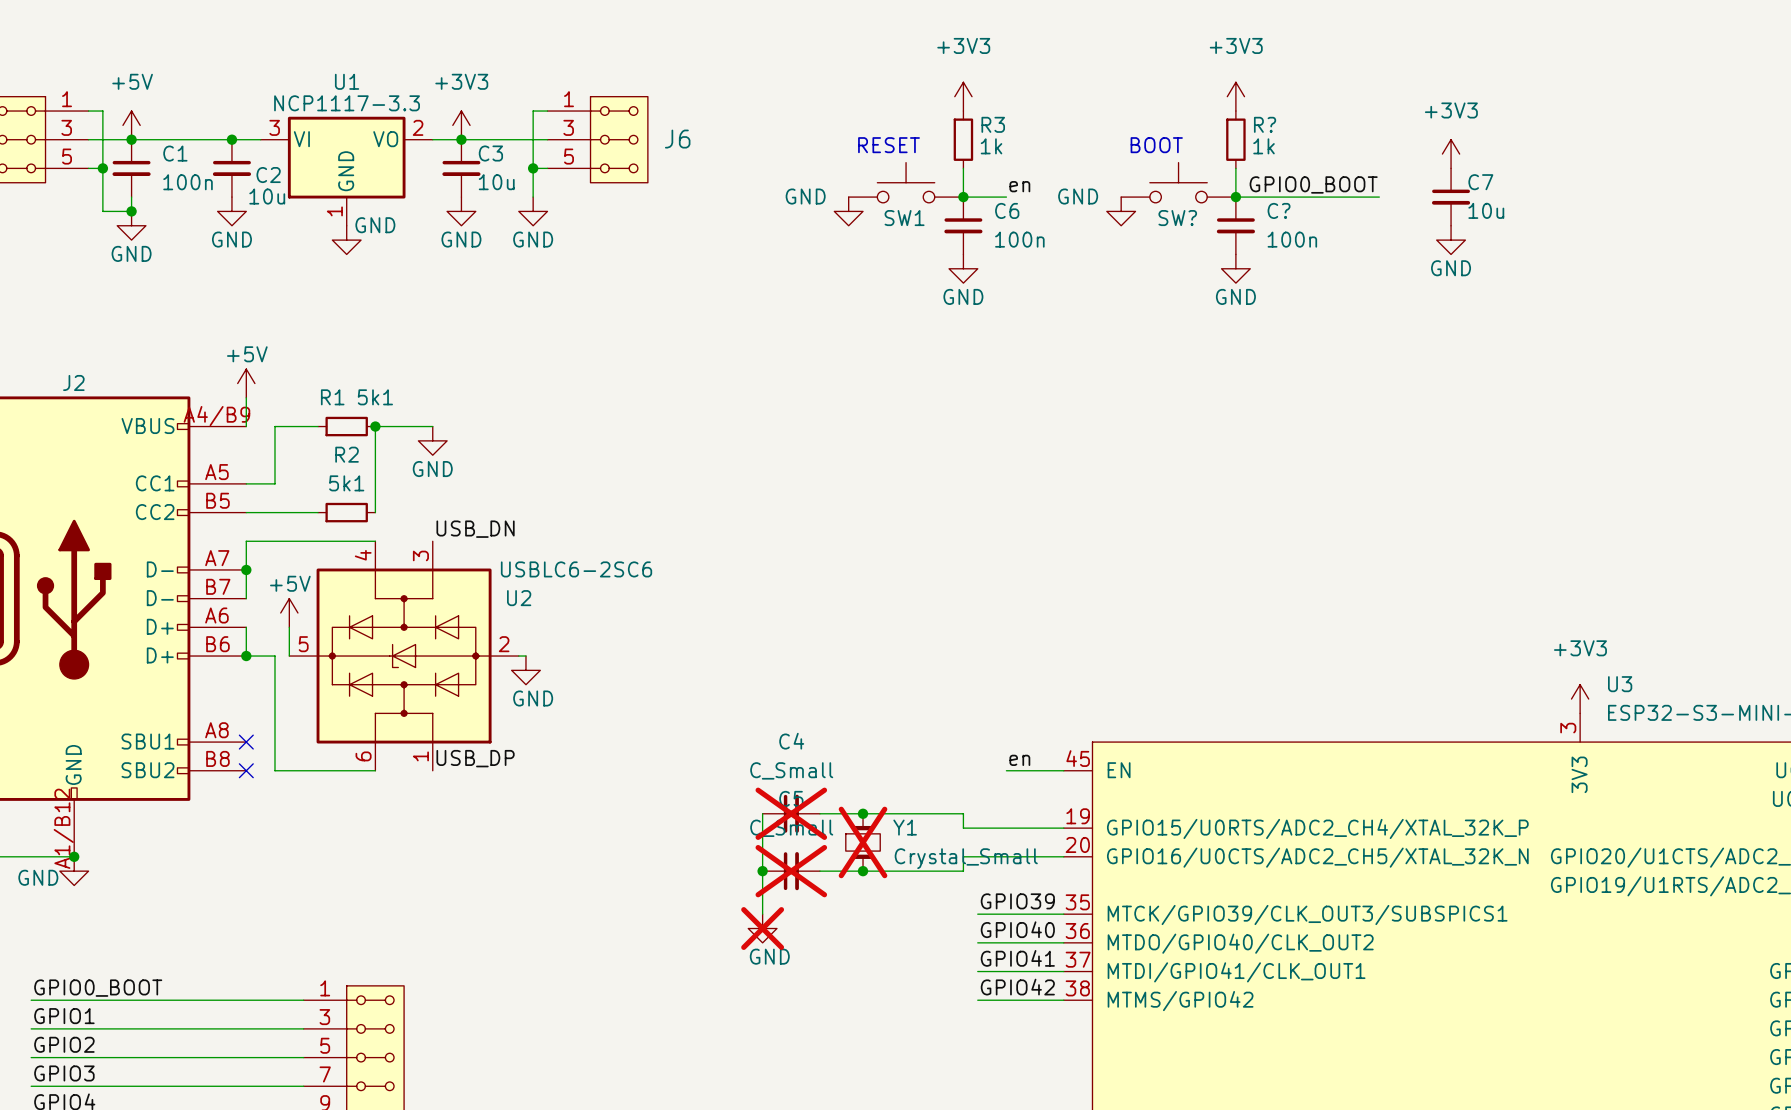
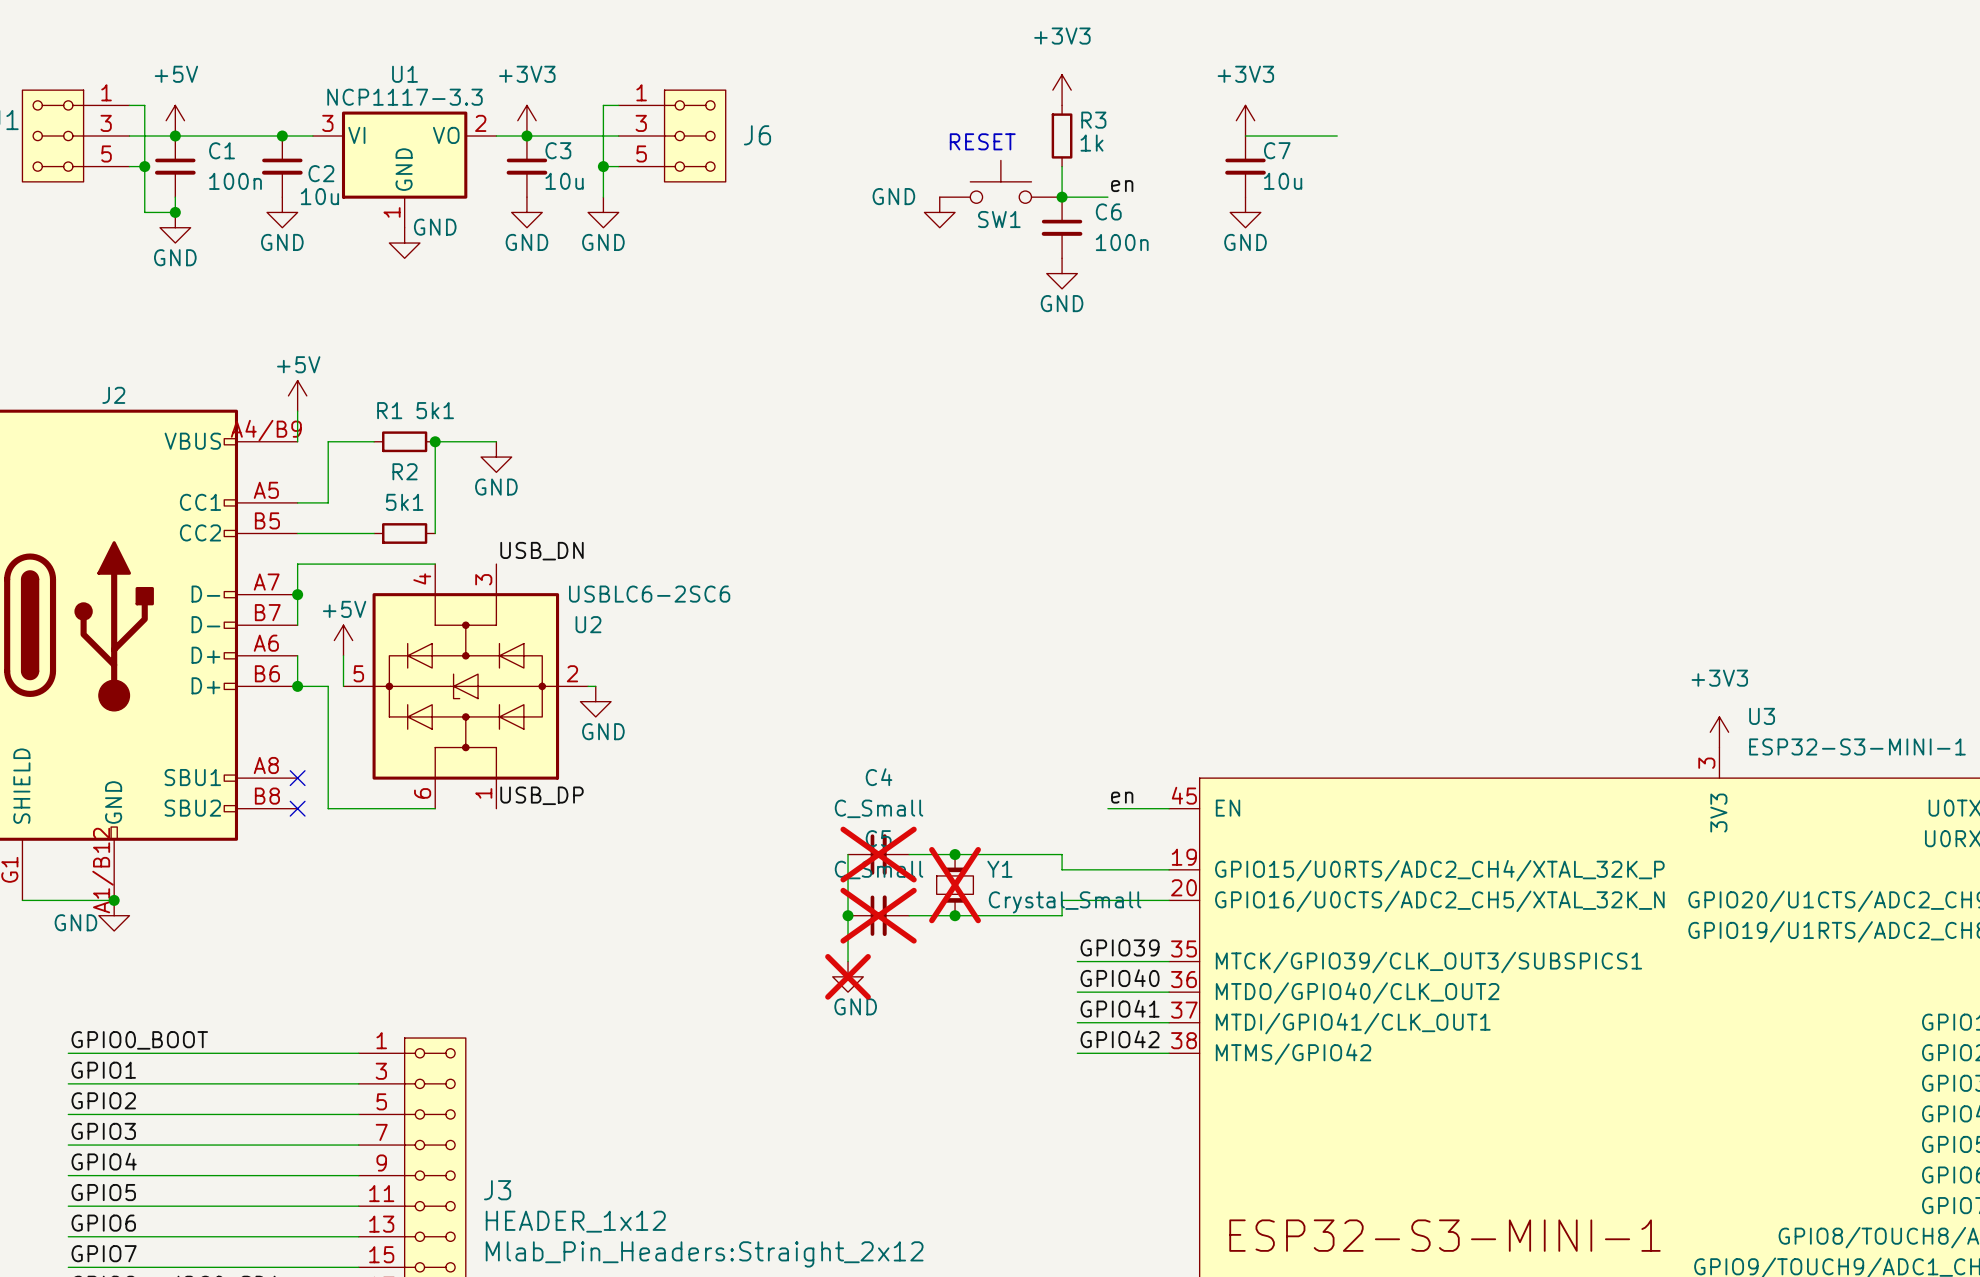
power symbol text position: +3V3 (1236, 45) -> +3V3 (1245, 74)
power symbol position: +3V3 (1235, 96) -> +3V3 (1245, 120)
wire: none -> (1245, 136) (1337, 136)
R?: 1k (1235, 139) -> none
text: BOOT (1156, 145) -> none
power symbol: +3V3 (1451, 154) -> none
wire: (1235, 168) (1235, 197) (1379, 197) -> none
SW?: (1178, 182) -> none
label: GPIO0_BOOT (1313, 184) -> none
power symbol text position: GND (1078, 196) -> GND (1245, 242)
junction: (1235, 197) -> none
C7 position: (1451, 197) -> (1245, 166)
power symbol position: GND (1121, 211) -> GND (1245, 212)
C?: 100n (1235, 225) -> none
power symbol: GND (1451, 240) -> none
power symbol: GND (1235, 268) -> none

